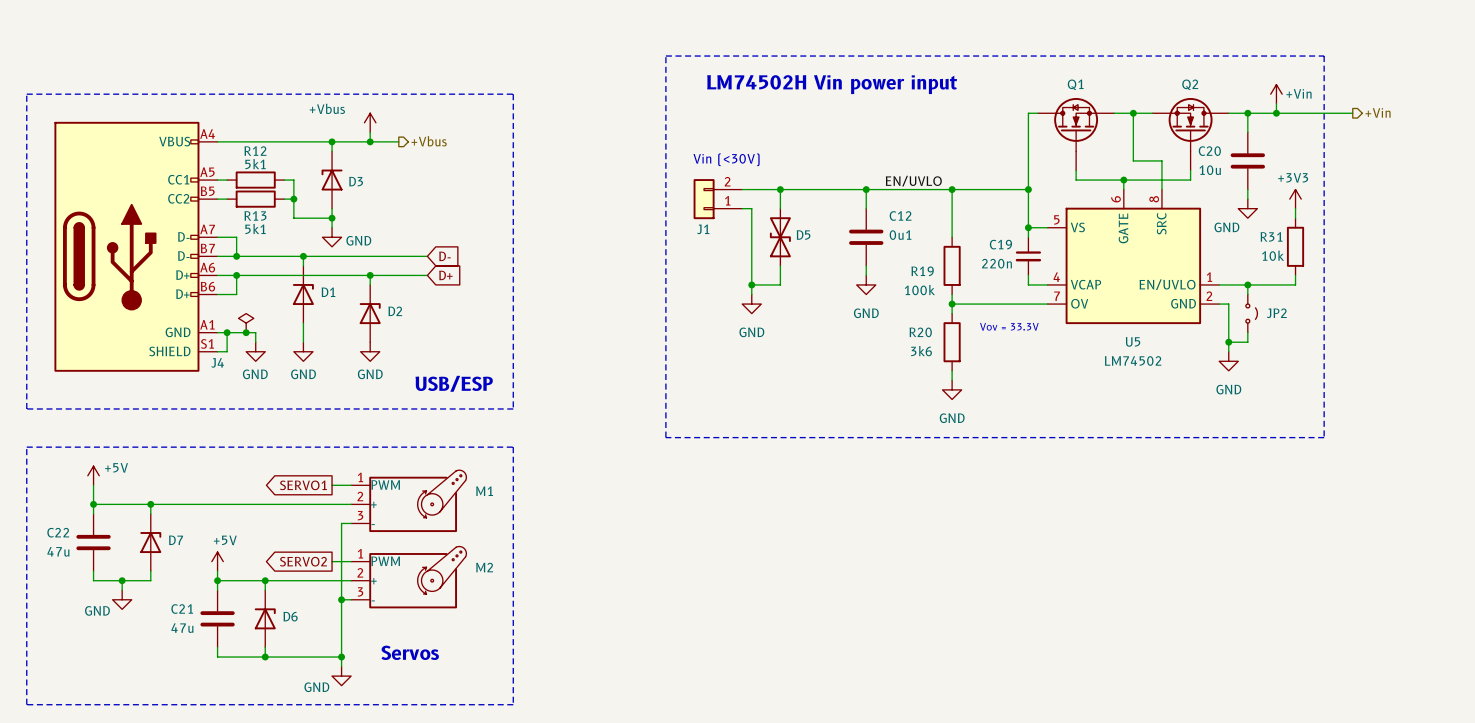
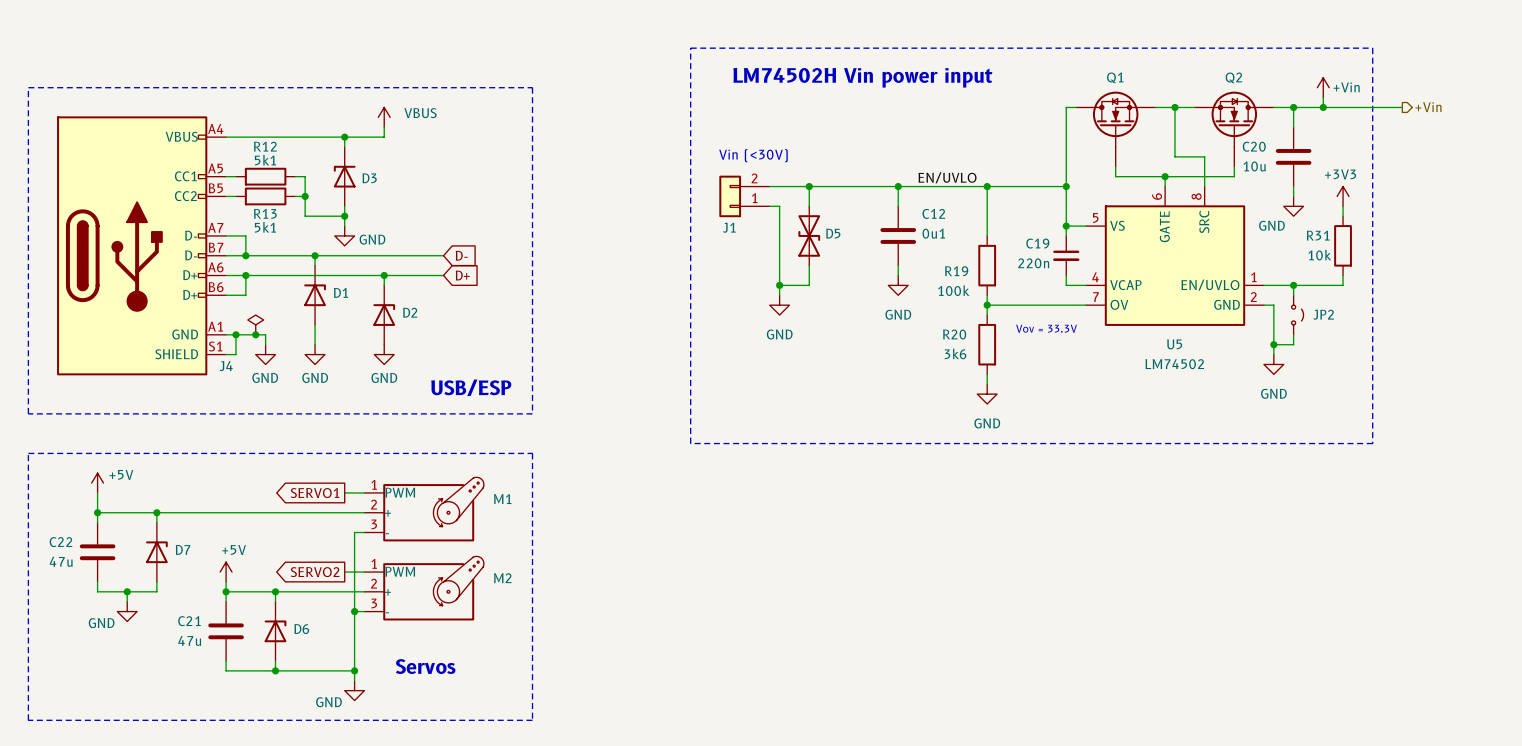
power symbol: +Vbus (370, 122) -> VBUS (384, 117)
wire: (370, 141) (398, 141) -> none
junction: (370, 141) -> none
hierarchical label: +Vbus (429, 141) -> none

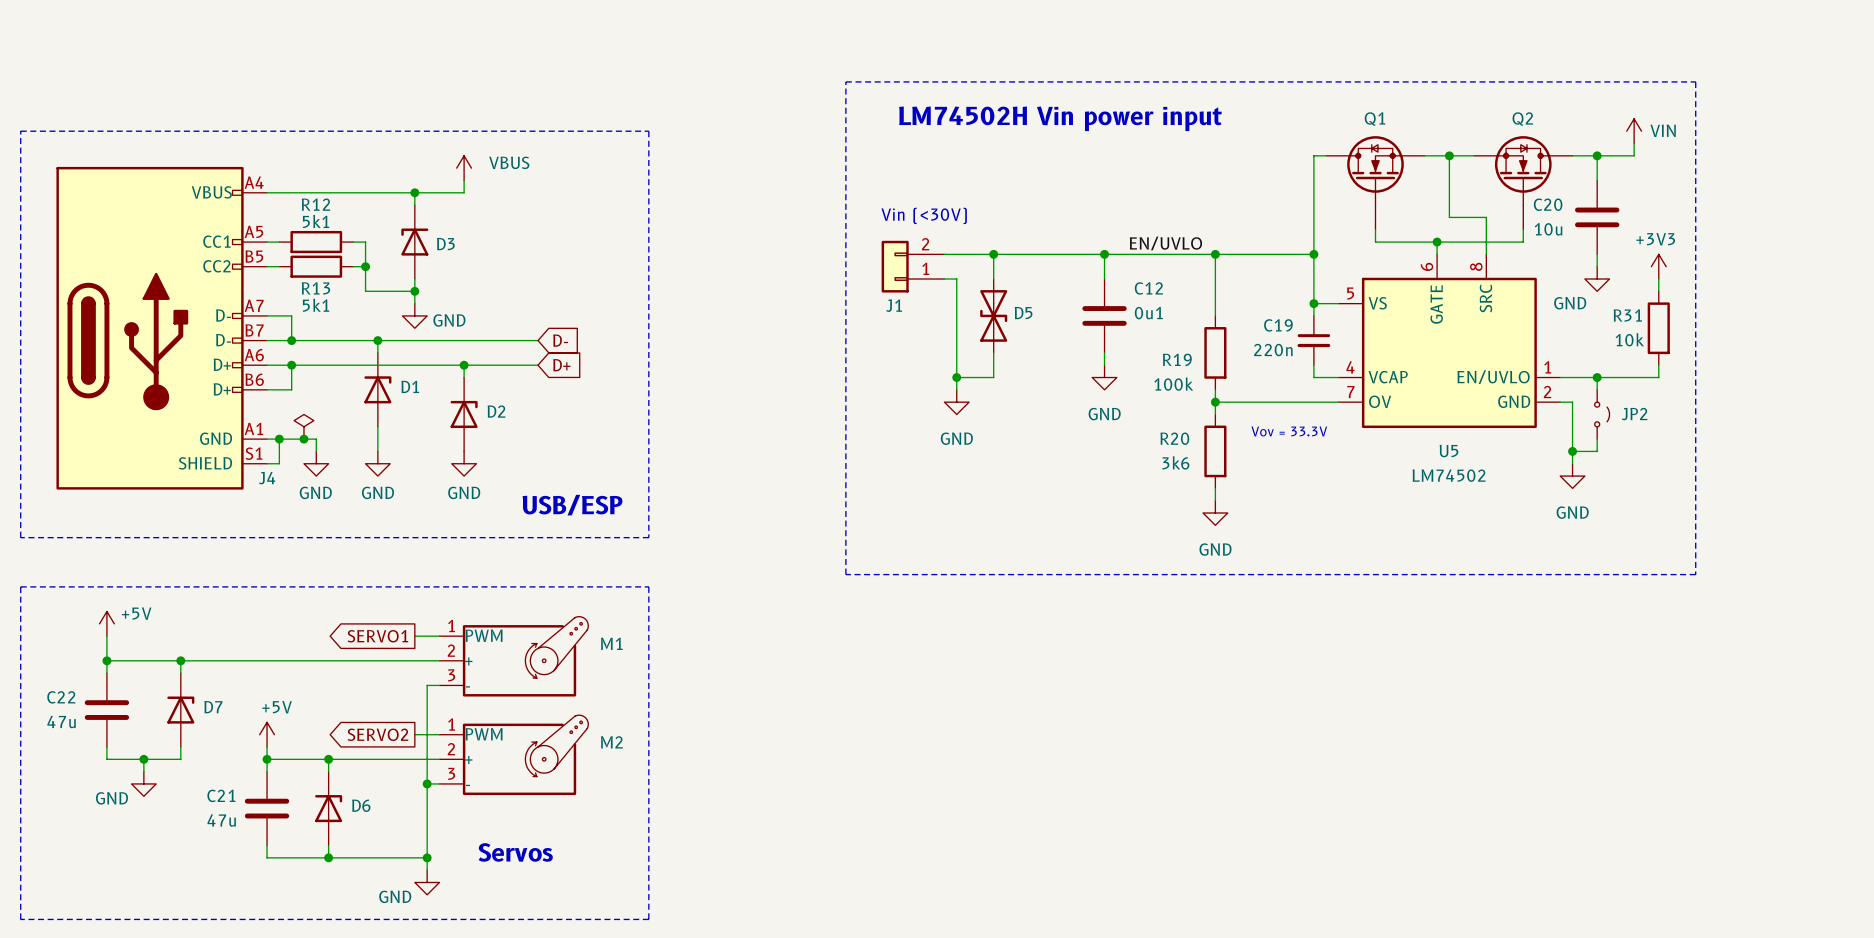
power symbol: +Vin (1323, 87) -> VIN (1634, 131)
wire: (1323, 107) (1402, 107) -> none
junction: (1323, 107) -> none
hierarchical label: +Vin (1428, 107) -> none

